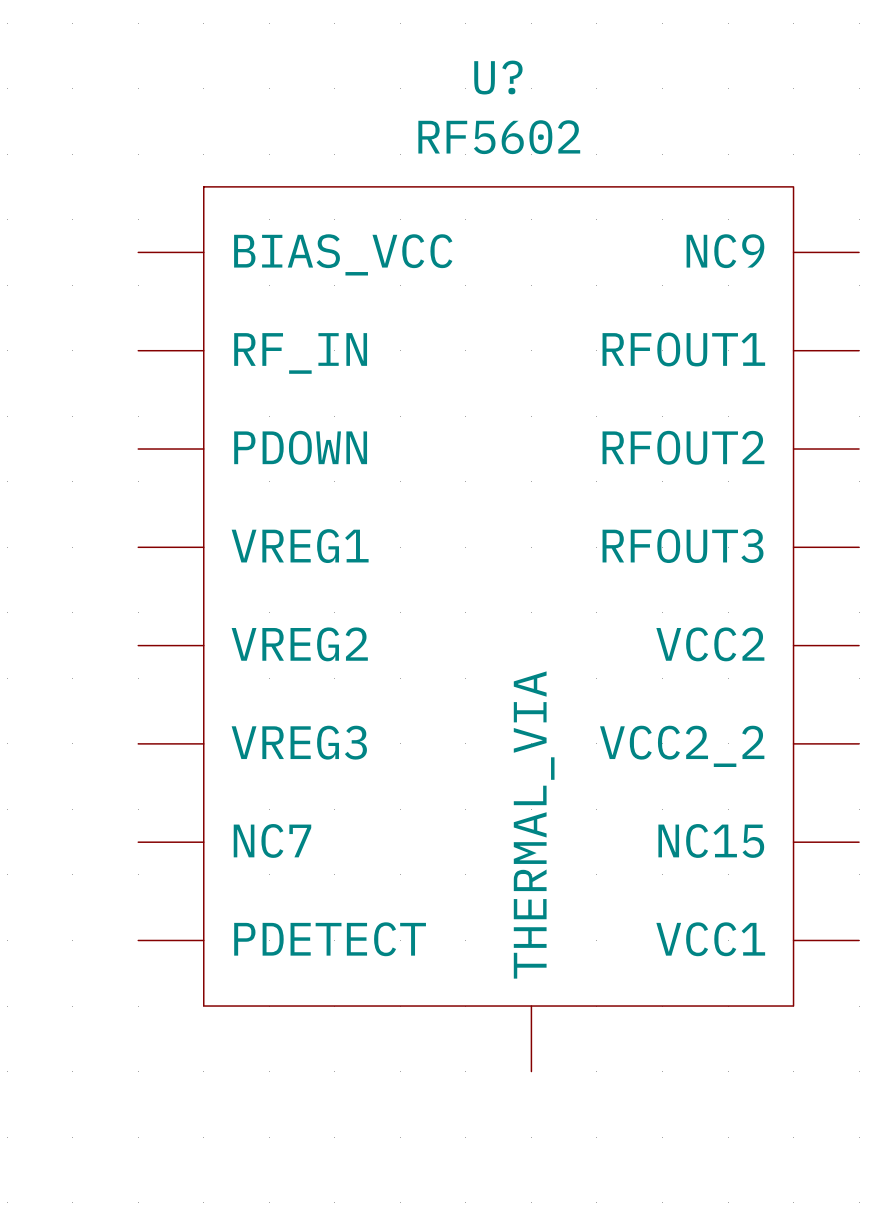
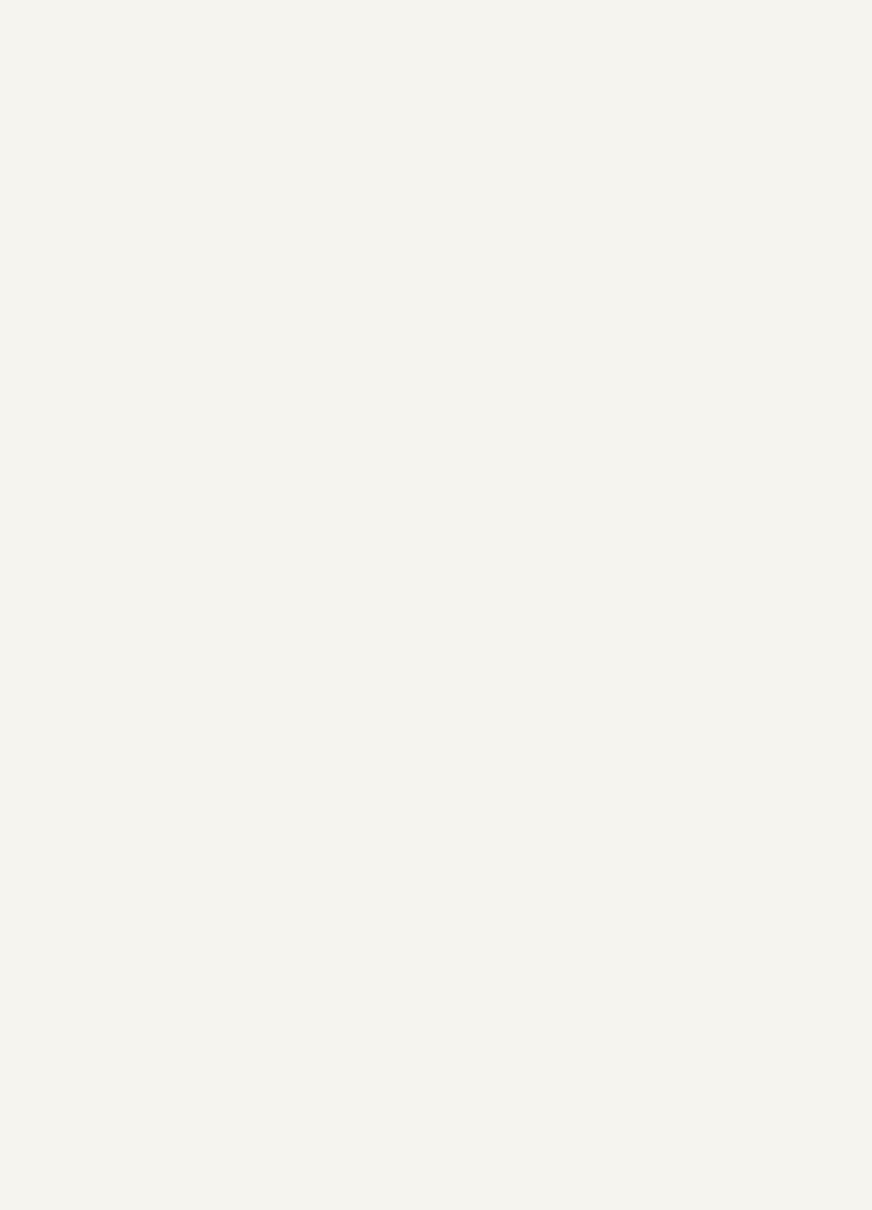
U?: RF5602 (498, 629) -> none

